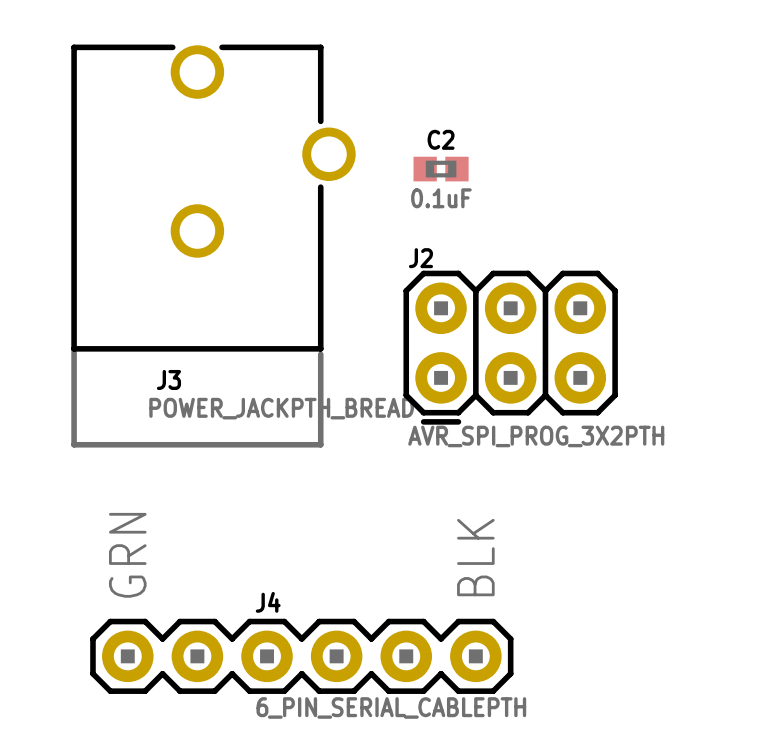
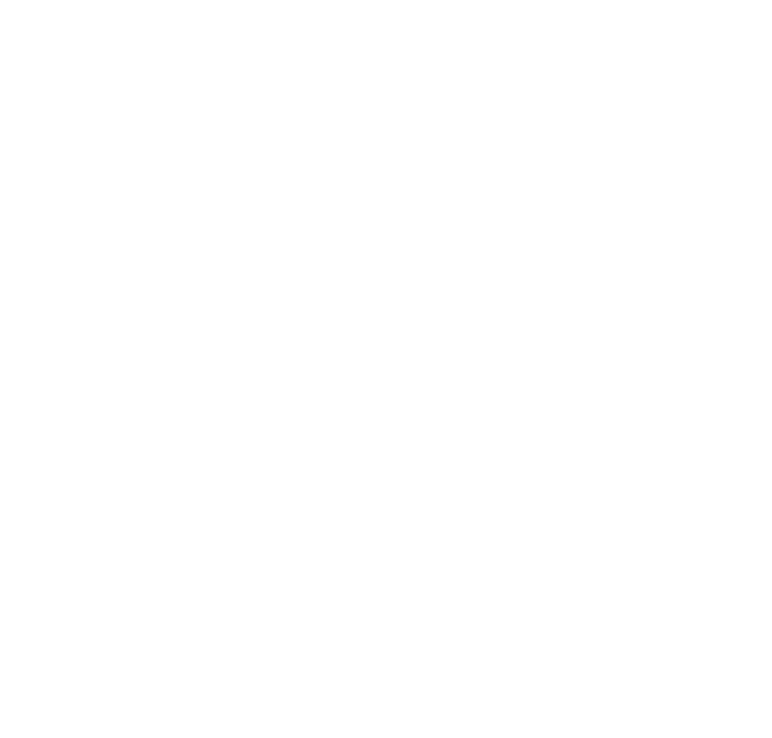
C2: 0.1uF (441, 169) -> none
J3: POWER_JACKPTH_BREAD (213, 246) -> none
J2: AVR_SPI_PROG_3X2PTH (510, 347) -> none
J4: 6_PIN_SERIAL_CABLEPTH (301, 656) -> none

